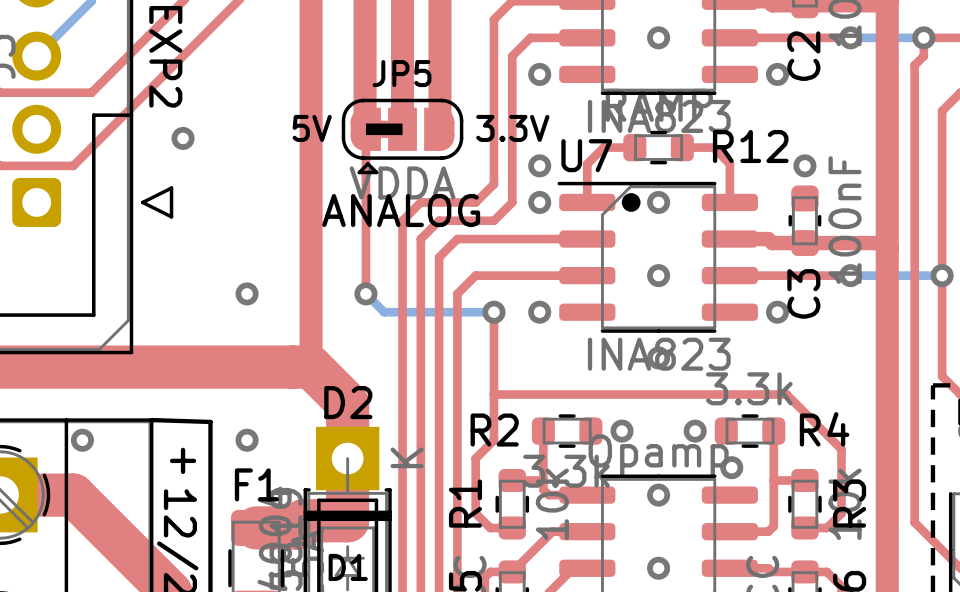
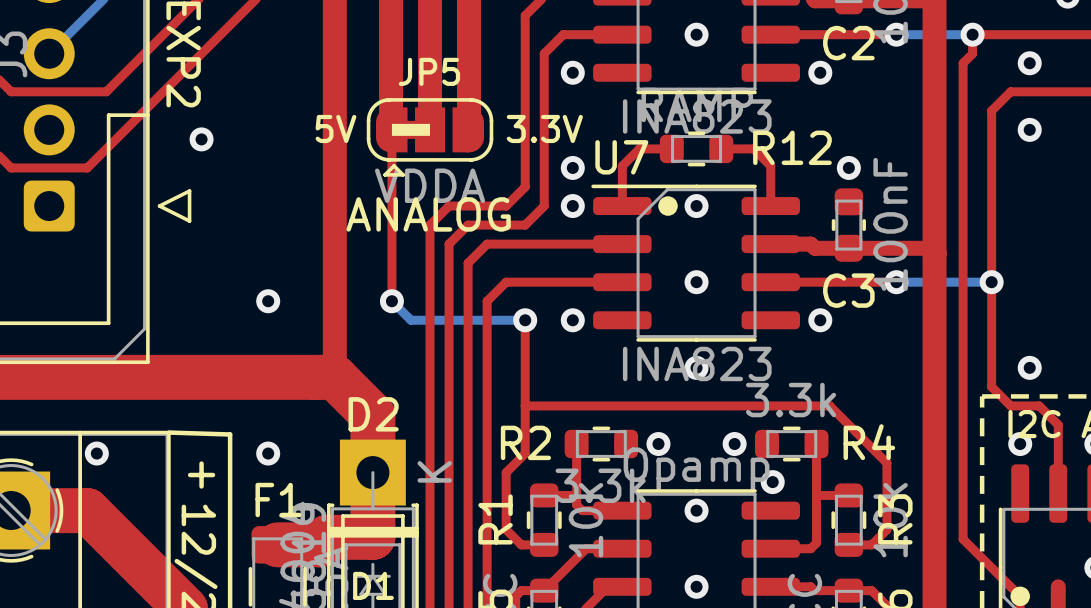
C2 name rotation: 0° (803, 56) -> 90° clockwise (848, 43)
C3 name rotation: 0° (803, 293) -> 90° clockwise (848, 290)

